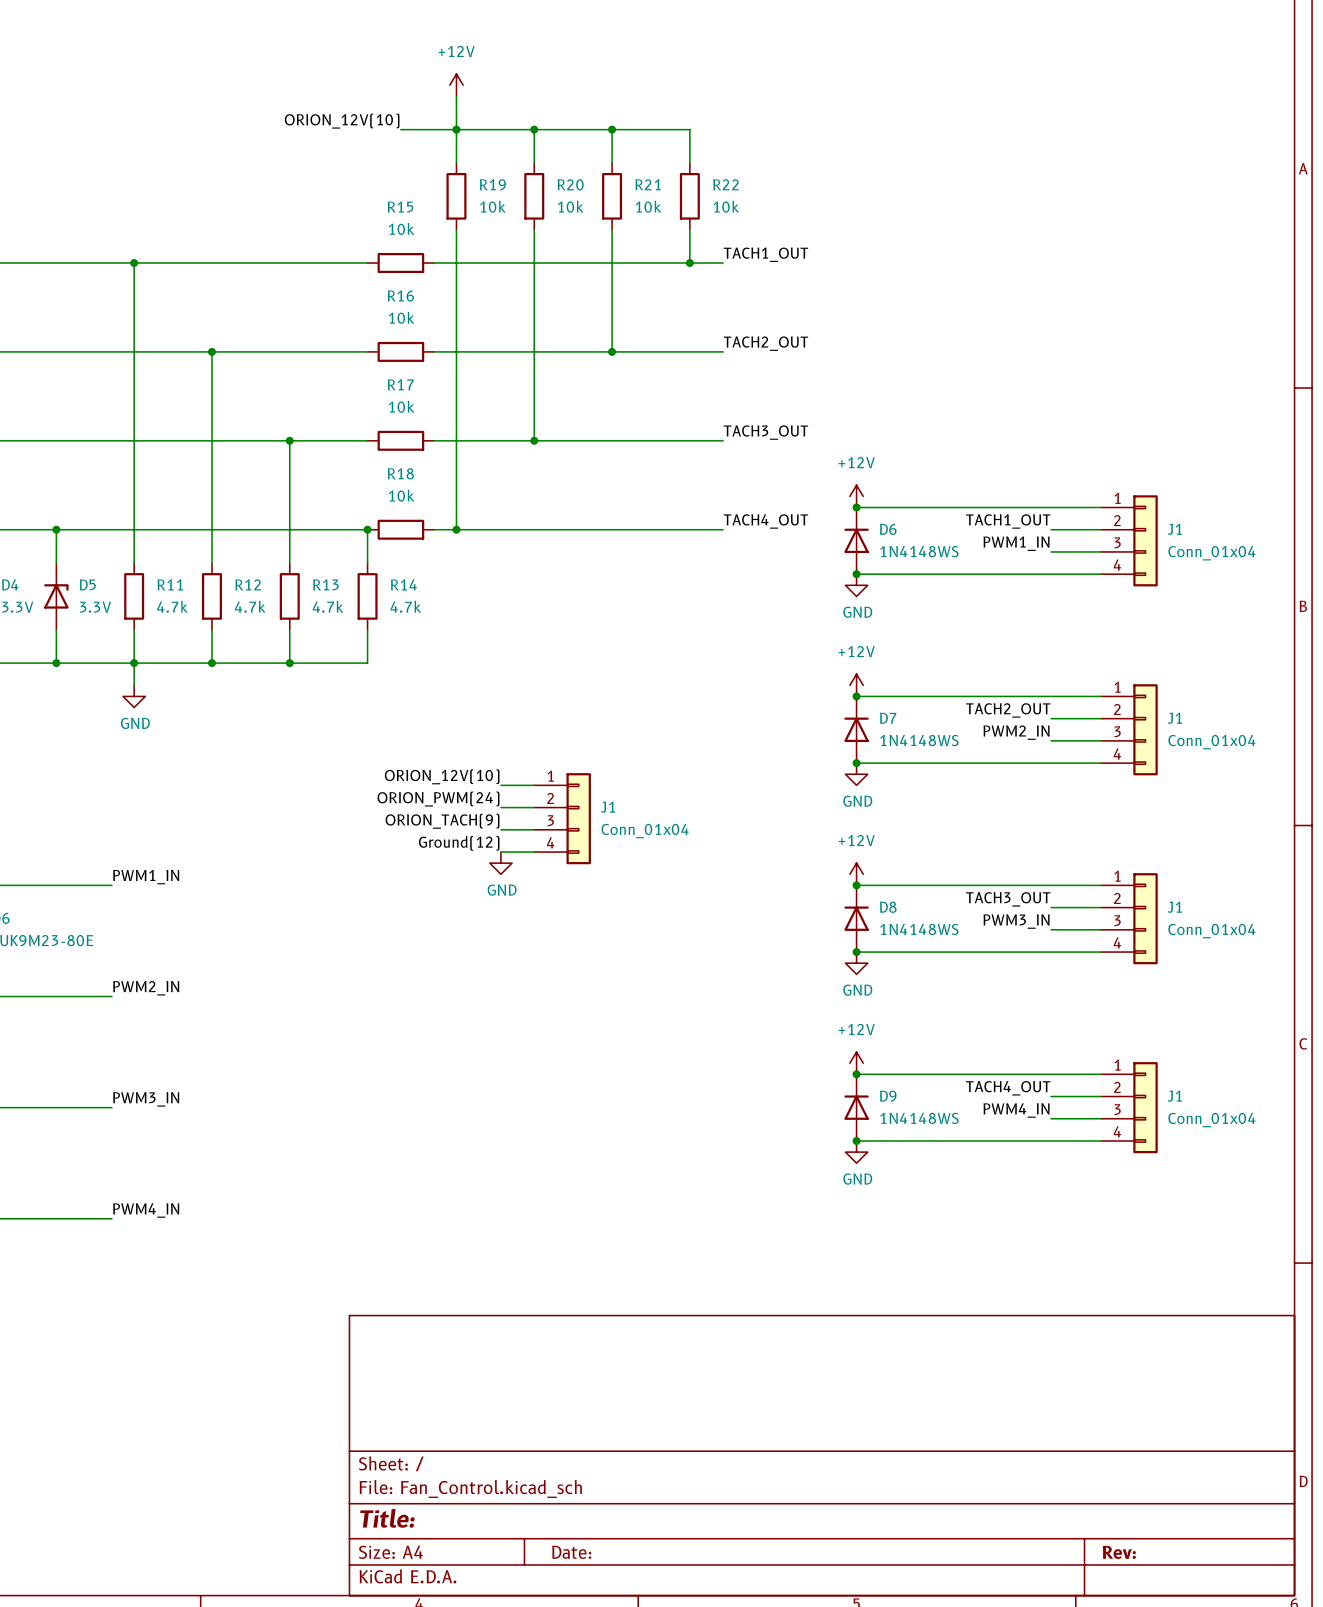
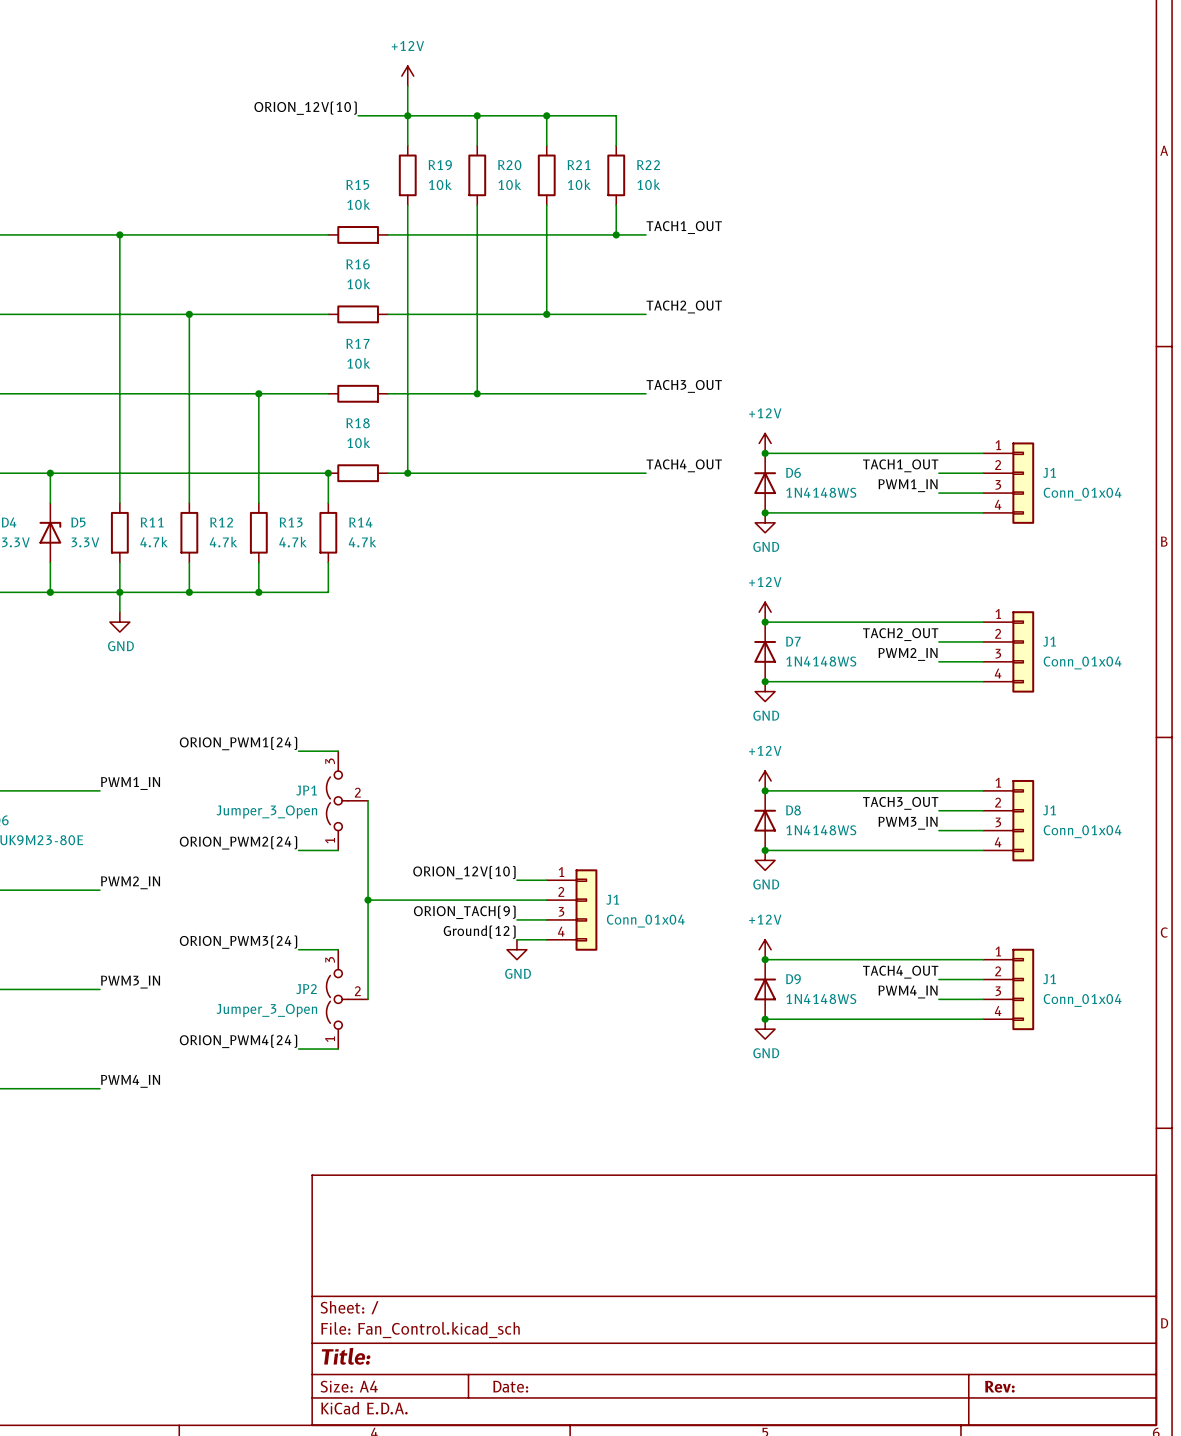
label position: ORION_12V(10) (442, 776) -> ORION_12V(10) (464, 872)
wire: (500, 785) (534, 785) -> (516, 880) (546, 880)
label: ORION_PWM(24) (438, 799) -> none
wire: (500, 807) (534, 807) -> none
J1 position: (562, 818) -> (572, 910)
label position: ORION_TACH(9) (442, 821) -> ORION_TACH(9) (464, 912)
wire: (500, 829) (534, 829) -> (516, 919) (546, 919)
label: none -> ORION_PWM1(24) (238, 743)
wire: none -> (298, 751) (338, 751)
label position: Ground(12) (459, 843) -> Ground(12) (479, 931)
wire: (500, 852) (534, 852) -> (516, 939) (546, 939)
power symbol position: GND (500, 863) -> GND (516, 949)
JP1: none -> Jumper_3_Open (347, 800)
wire: none -> (368, 800) (368, 999)
label: none -> ORION_PWM2(24) (238, 842)
wire: none -> (298, 850) (338, 850)
wire: none -> (368, 900) (546, 900)
junction: none -> (368, 900)
label: none -> ORION_PWM3(24) (238, 942)
wire: none -> (298, 949) (338, 949)
JP2: none -> Jumper_3_Open (347, 999)
label: none -> ORION_PWM4(24) (238, 1041)
wire: none -> (298, 1049) (338, 1049)

